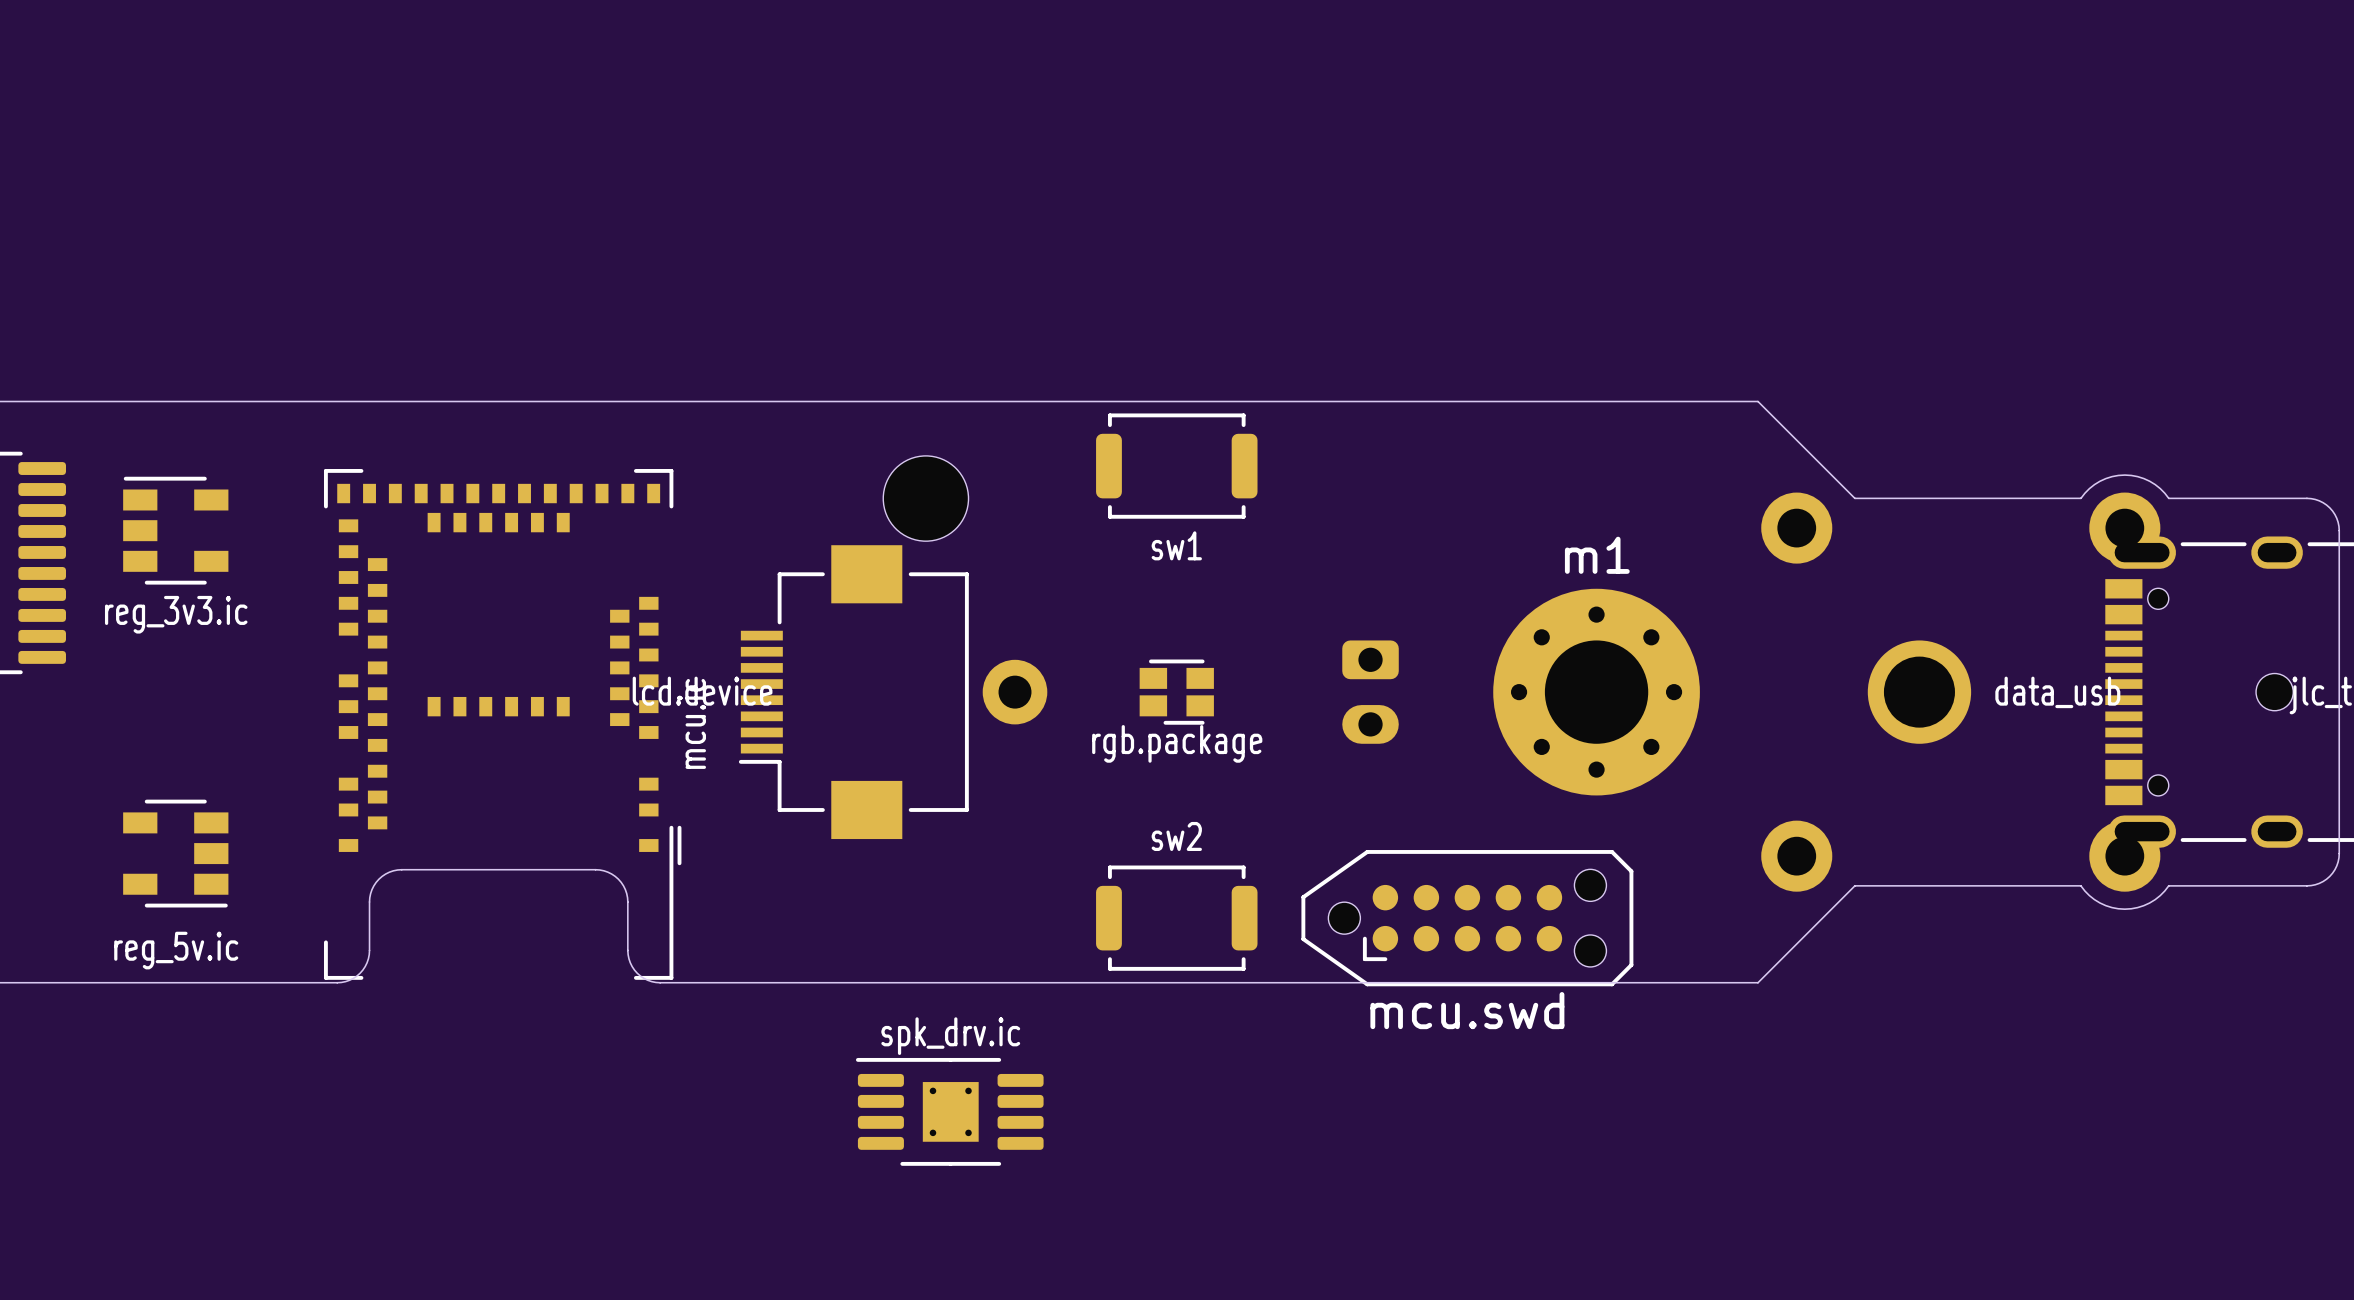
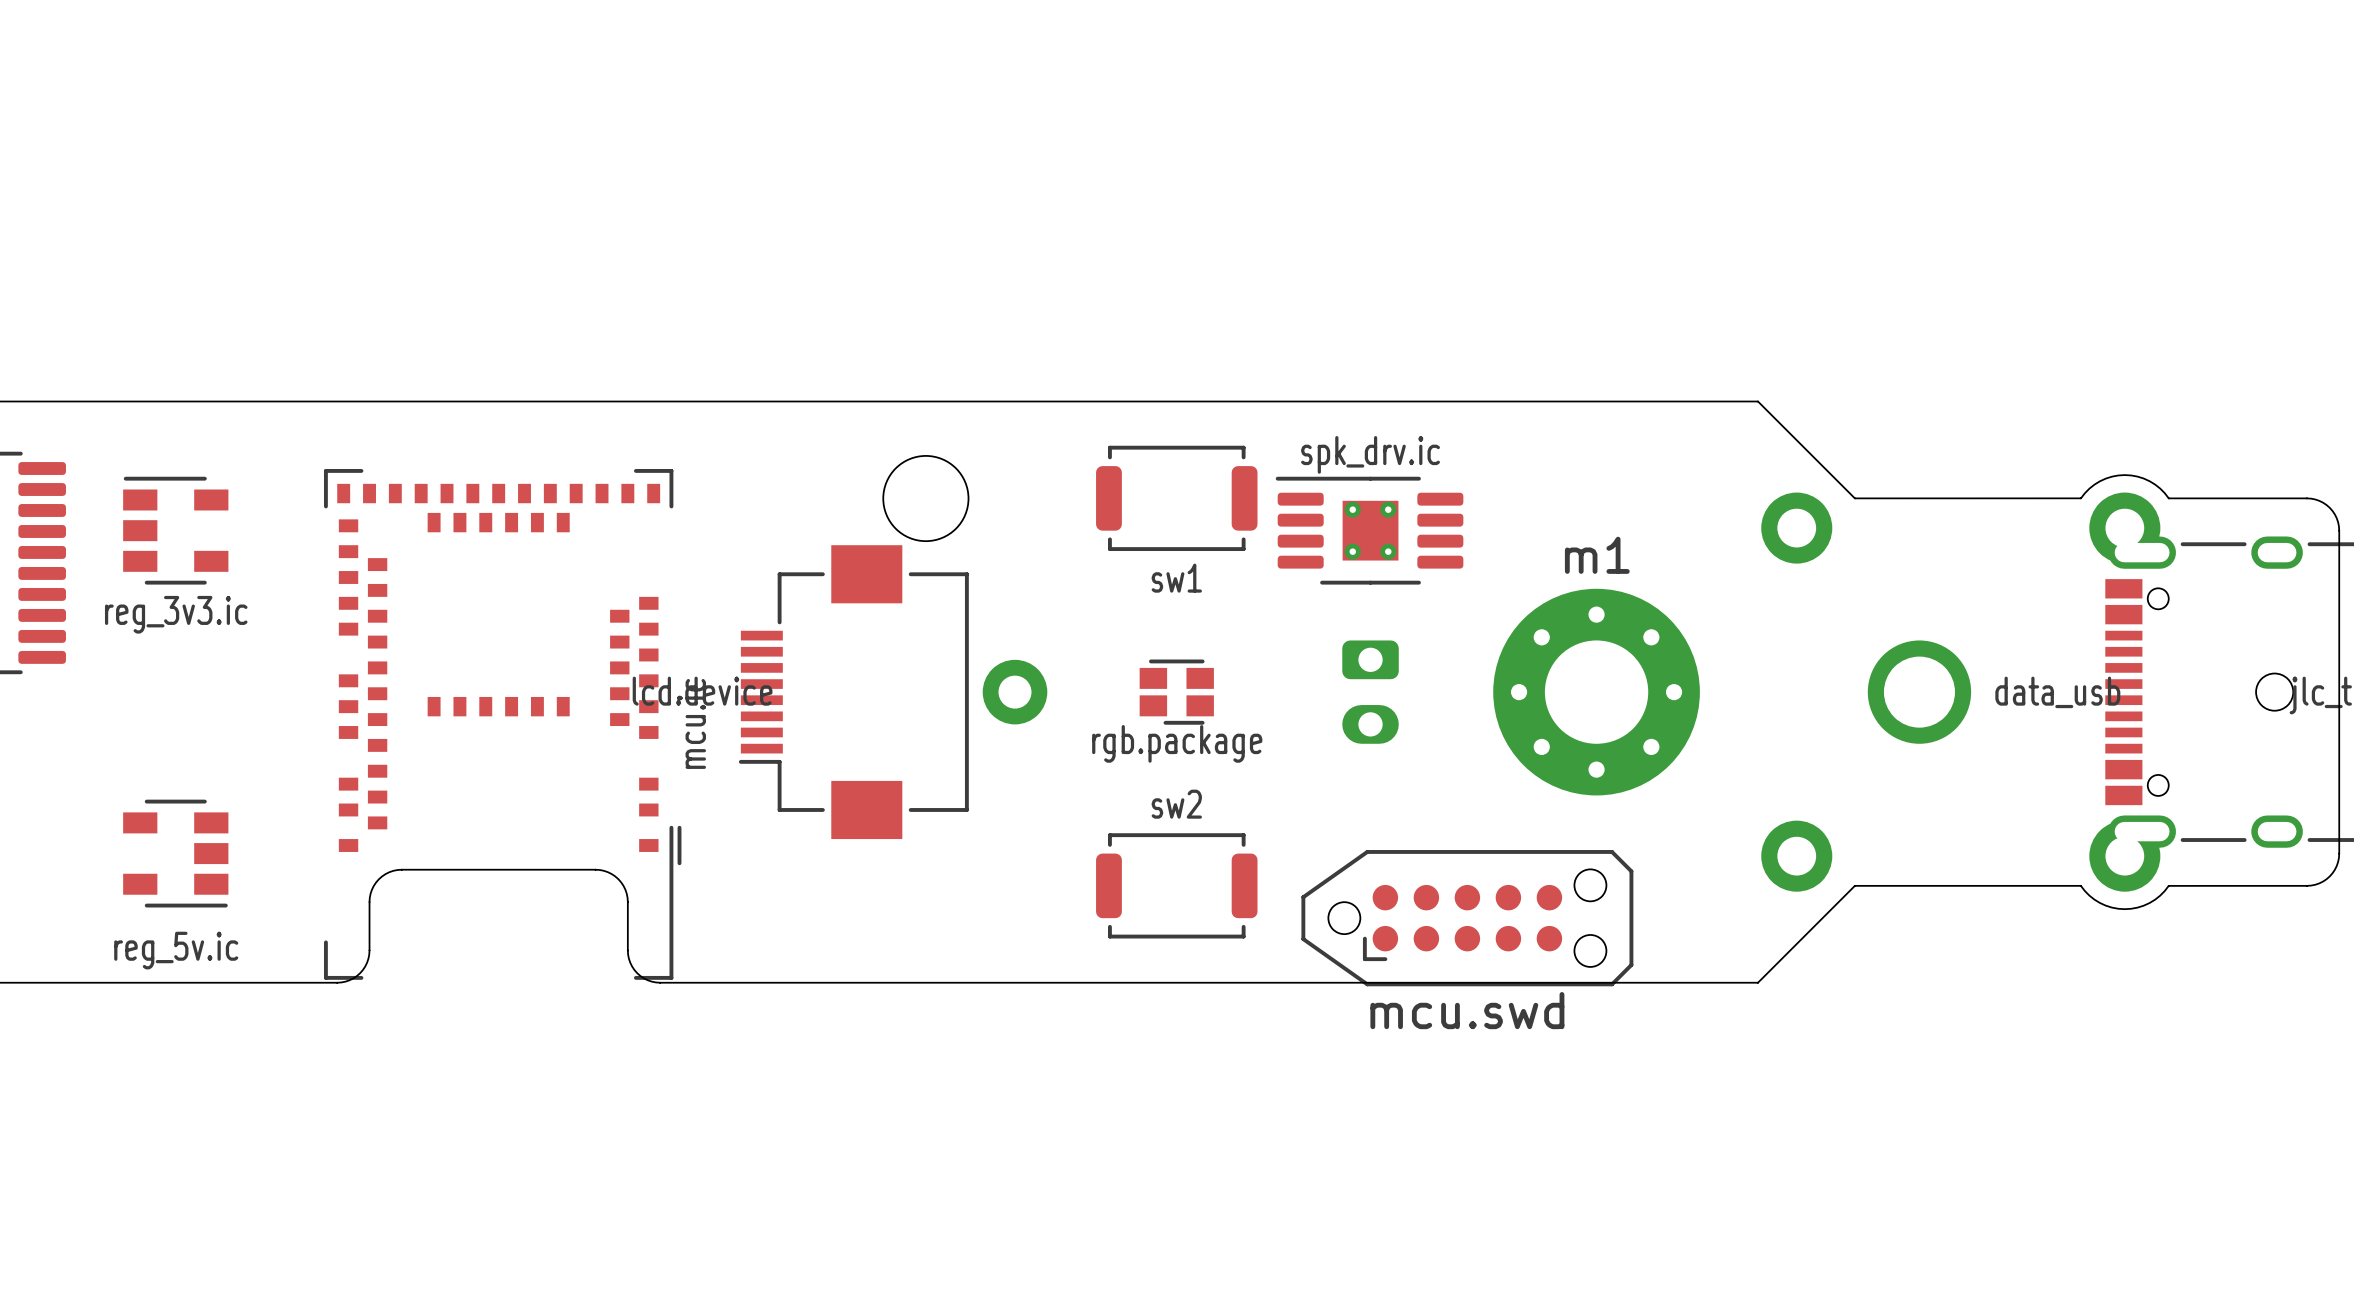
sw1 position: (1176, 466) -> (1176, 498)
sw2 position: (1176, 918) -> (1176, 885)
spk_drv.ic position: (949, 1111) -> (1369, 530)

